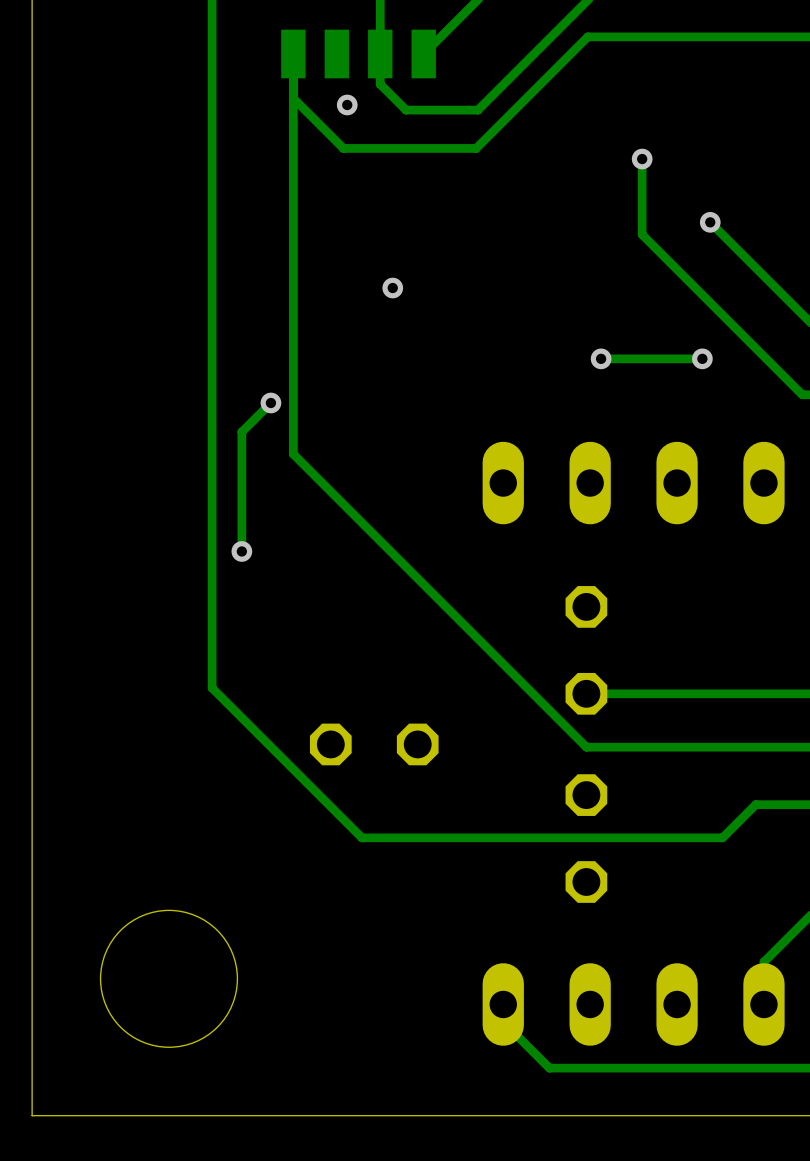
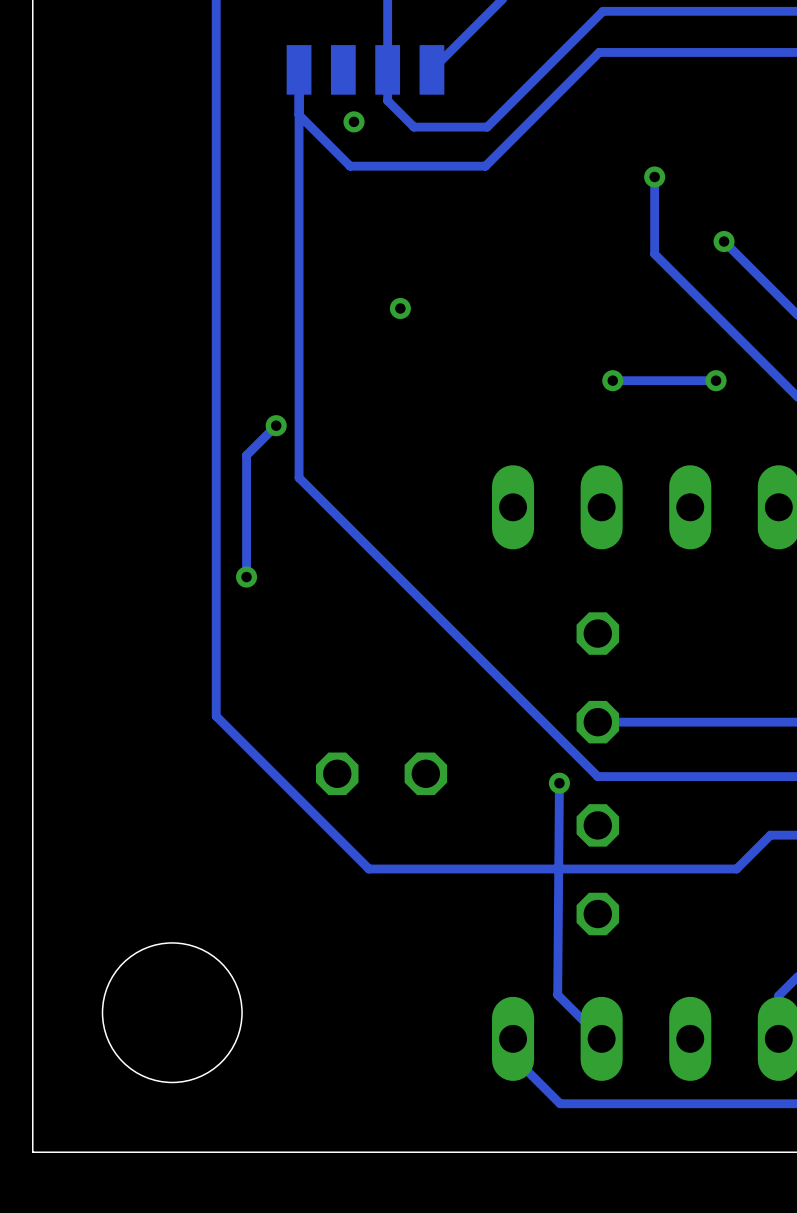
track: none -> (559, 783) (557, 994) (601, 1038)
via: none -> (559, 783)

